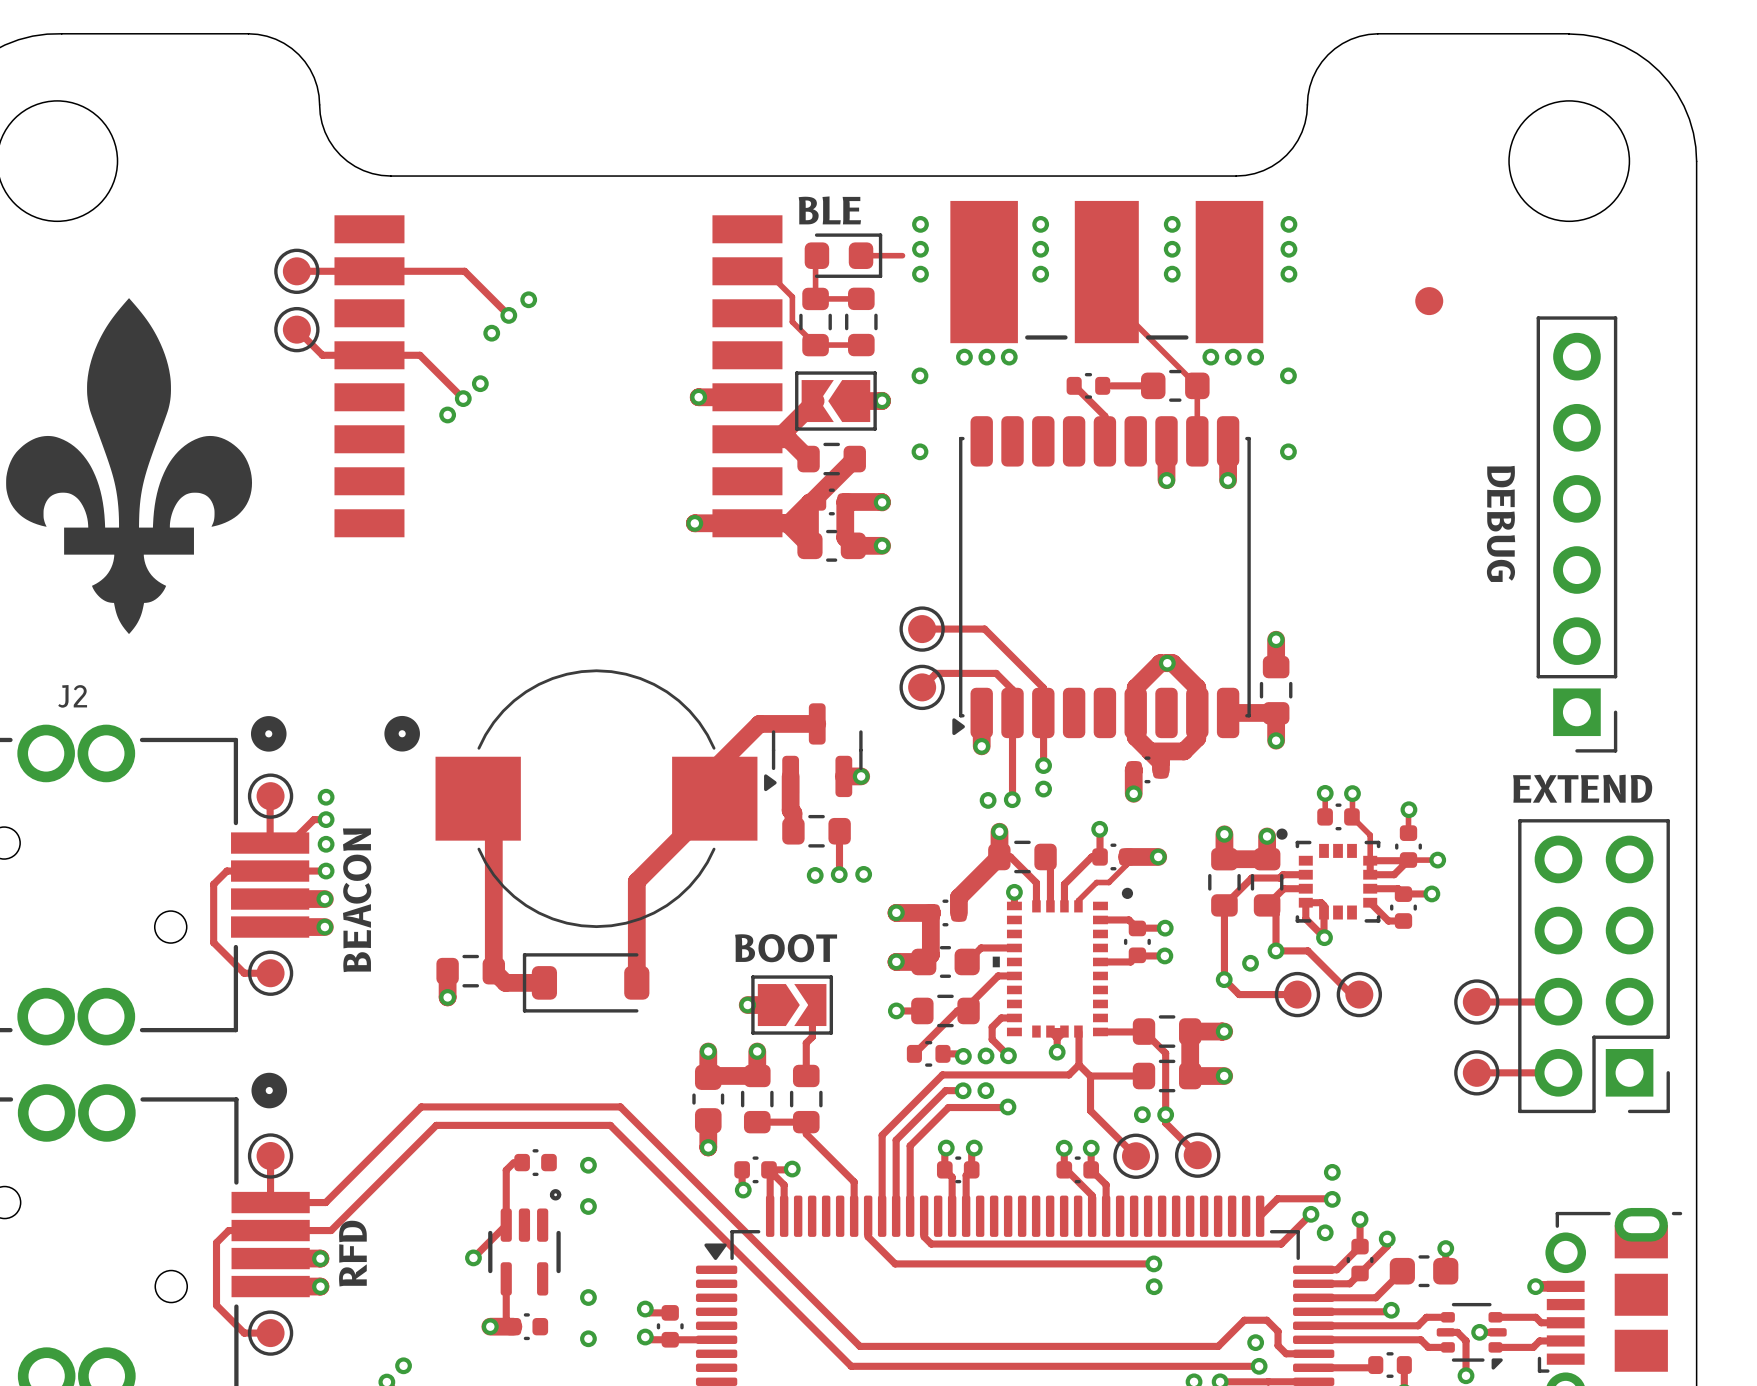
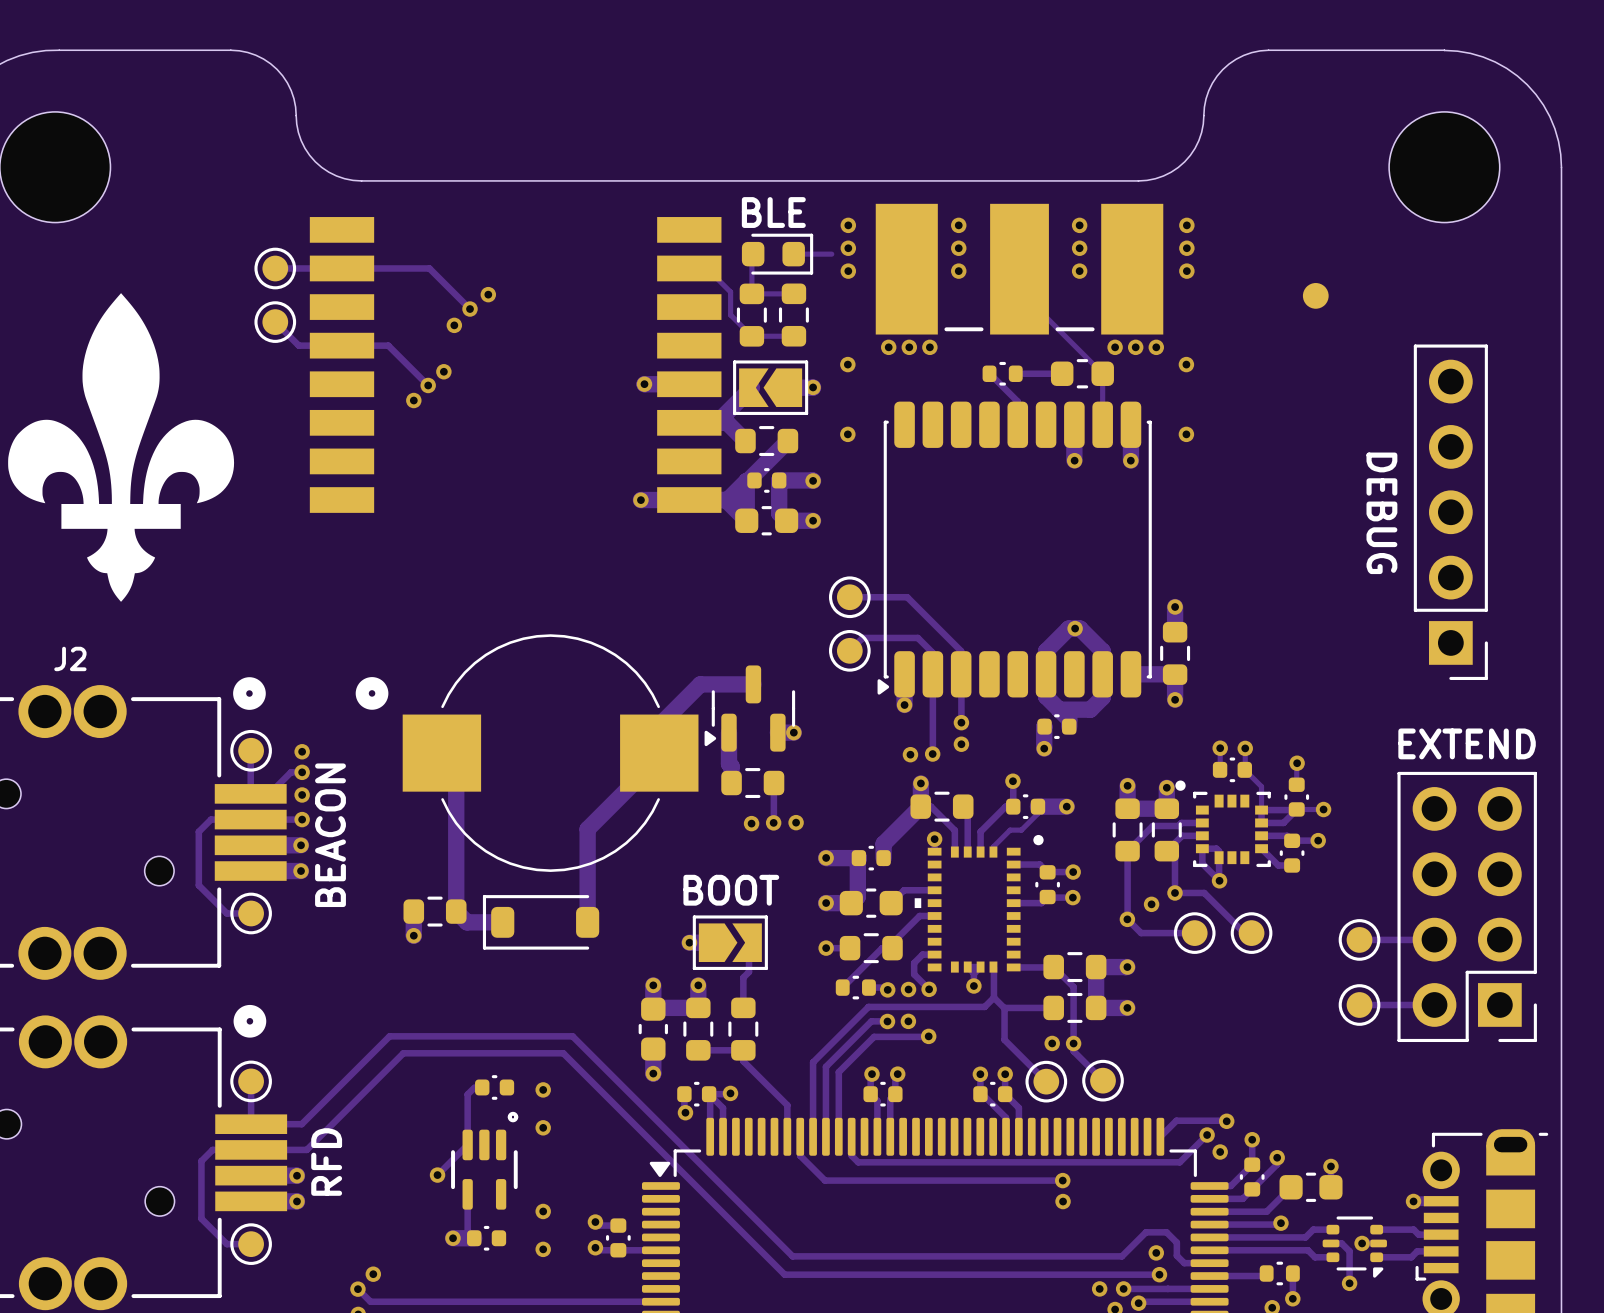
part footprint: [1536, 316, 1618, 753] -> [1413, 344, 1488, 680]
via: (1332, 1172) -> none

